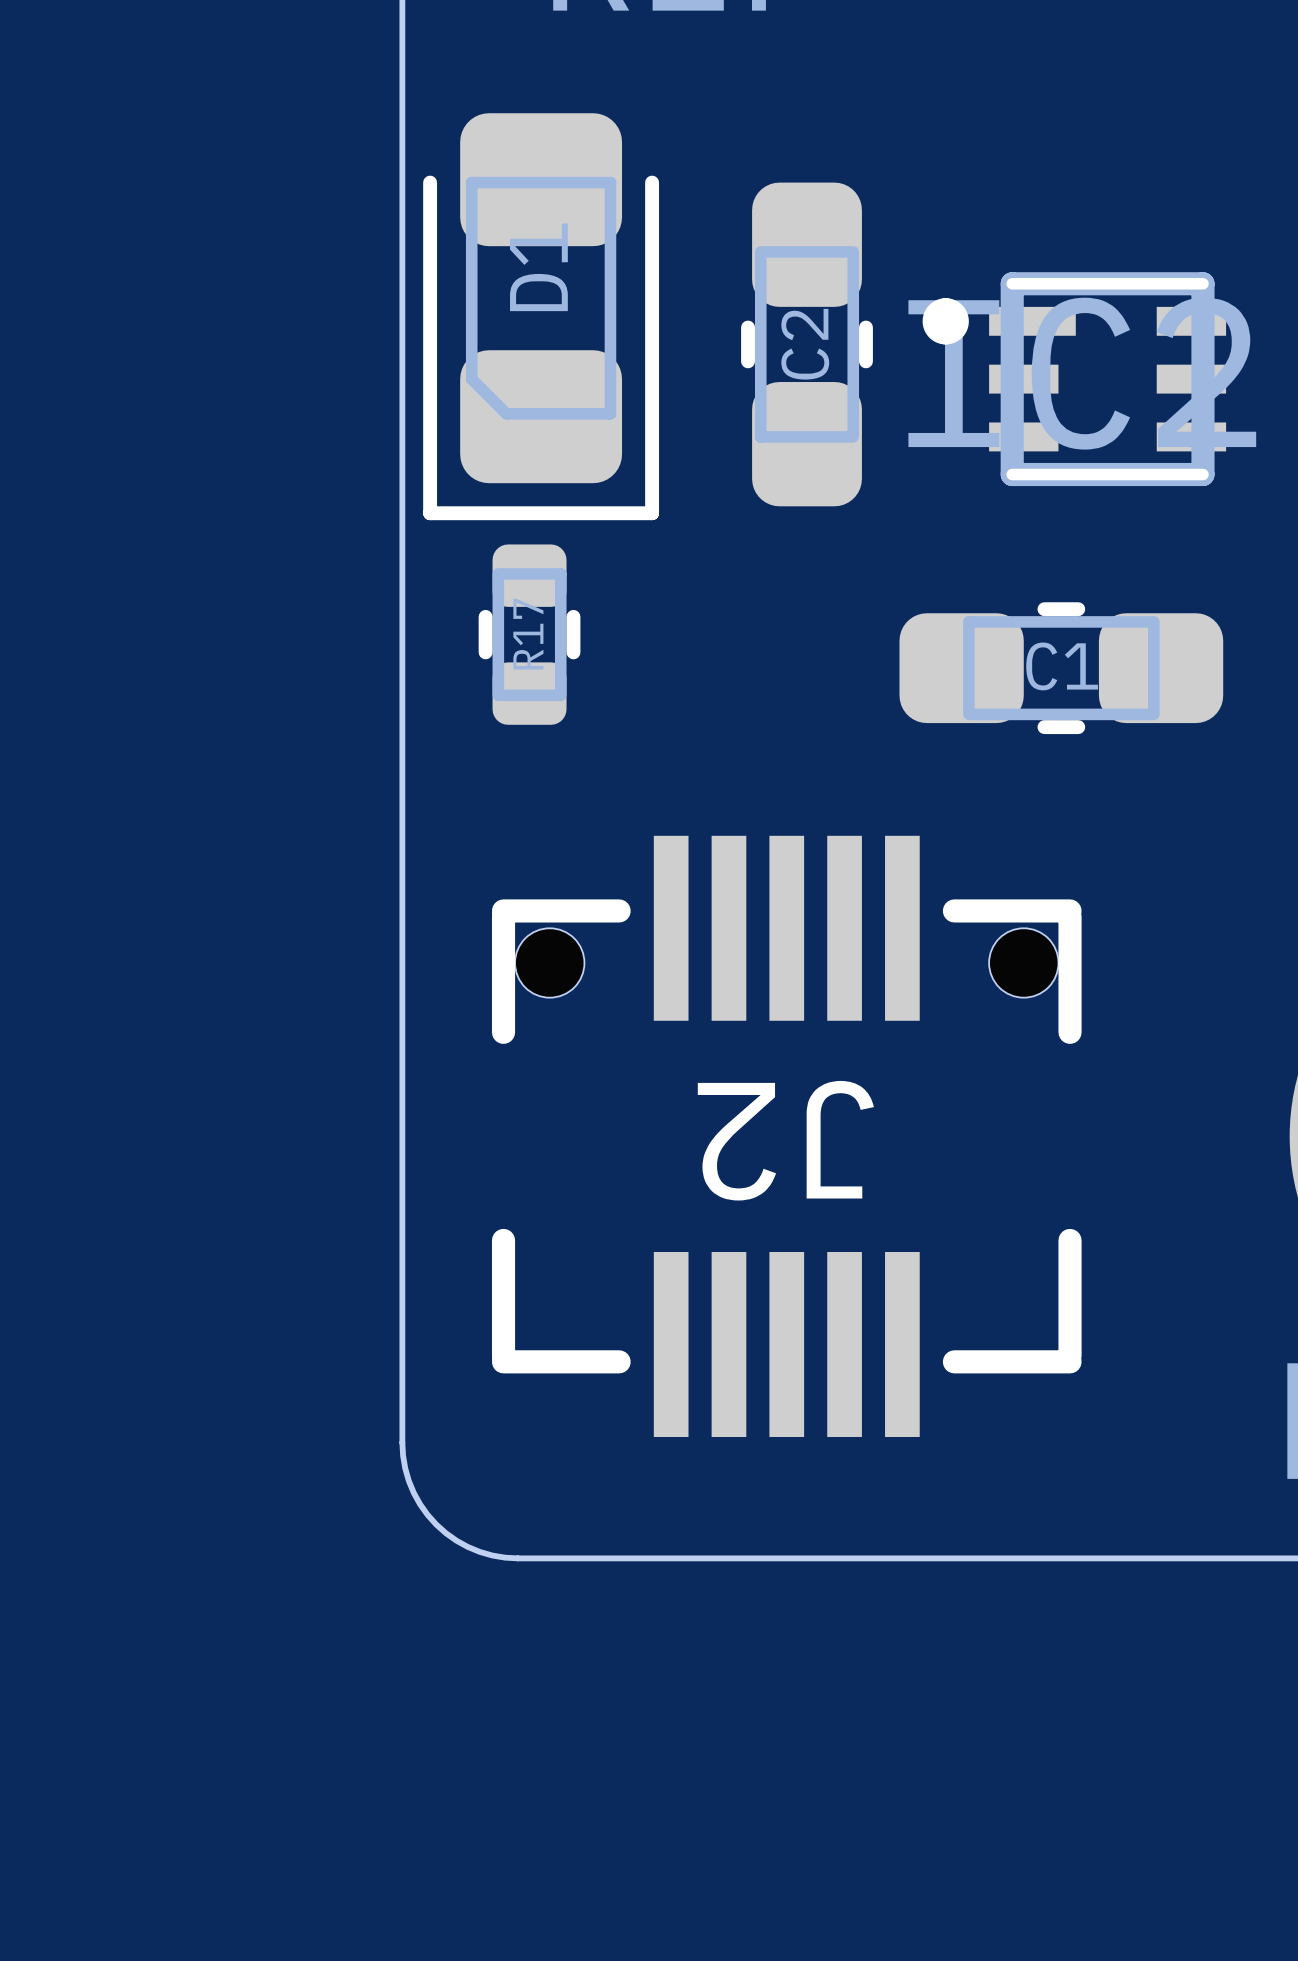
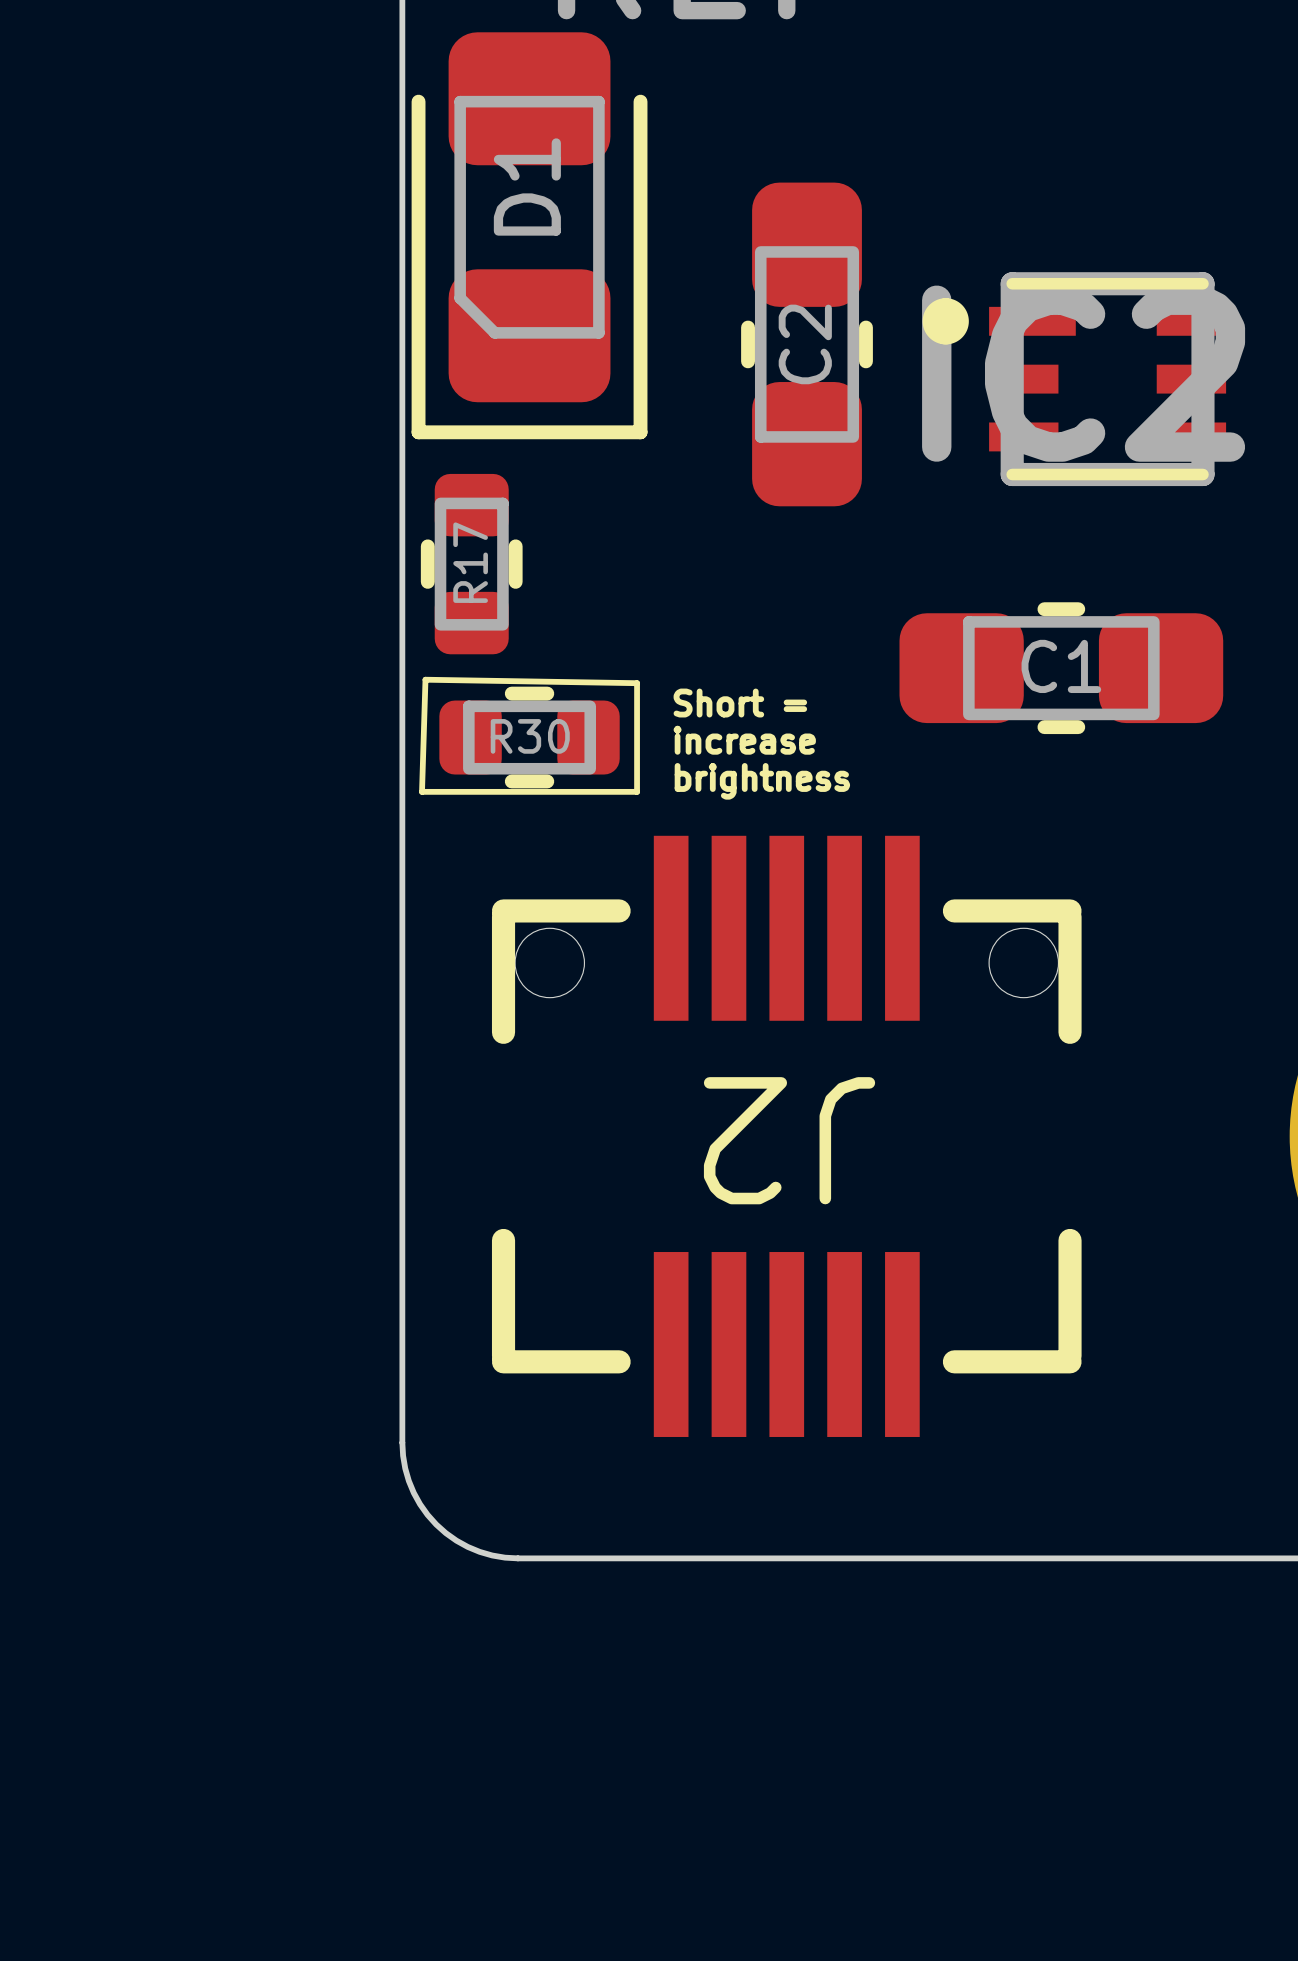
D1 position: (541, 316) -> (529, 235)
R17 position: (529, 634) -> (471, 564)
line: none -> (425, 679) (637, 683) (637, 791) (422, 791) (425, 679)
text: none -> Short = (740, 703)
R30: none -> (529, 737)
text: none -> increase (744, 740)
text: none -> brightness (762, 781)

